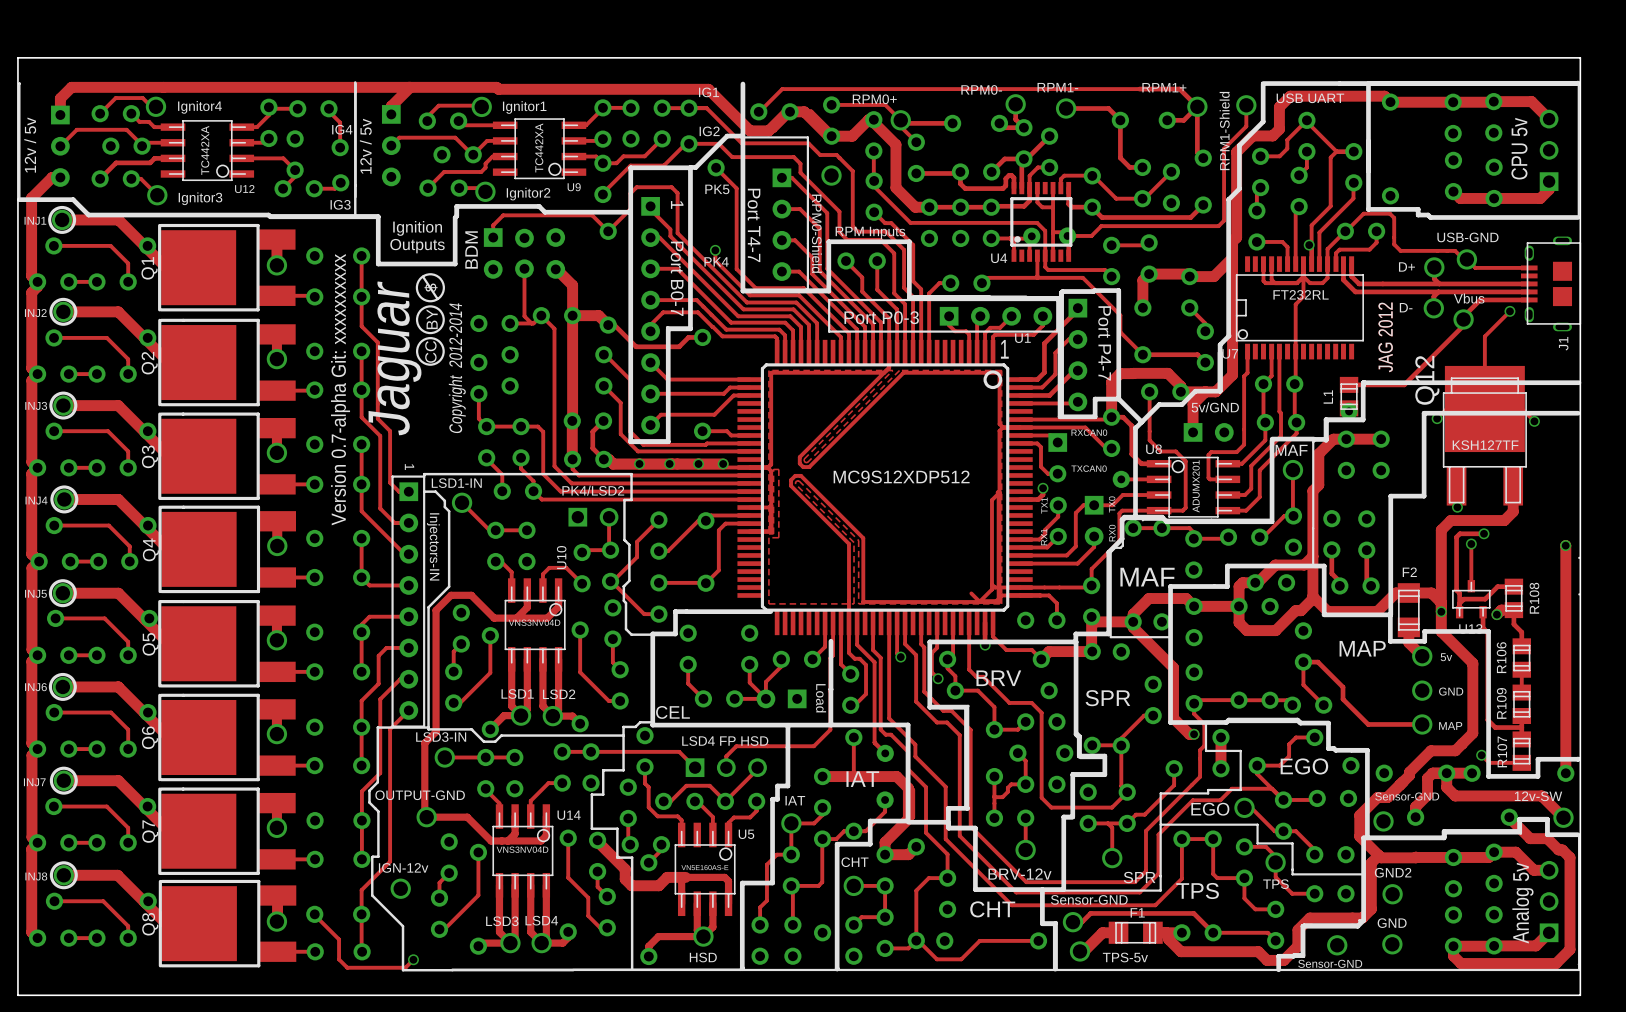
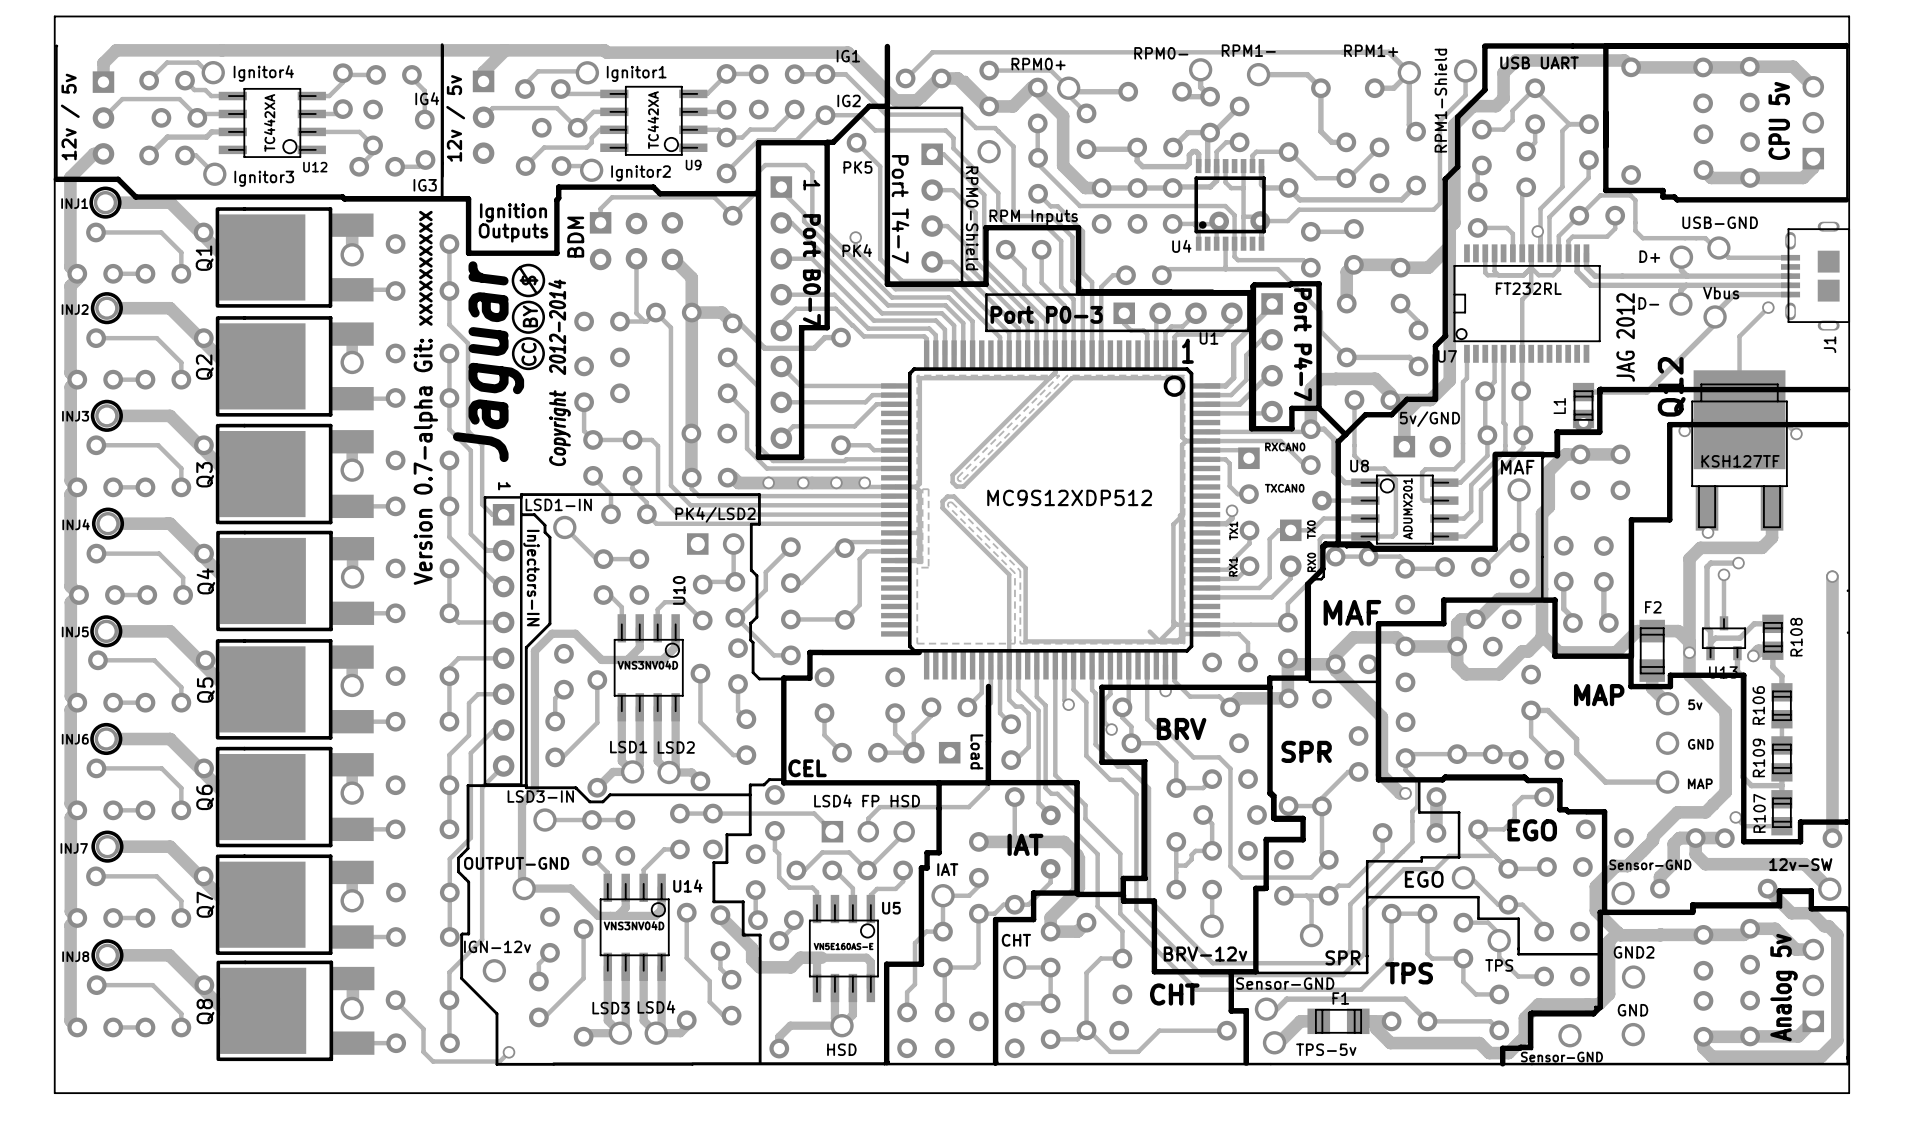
track: (603, 420) (592, 431) (592, 448) (603, 459) -> none

